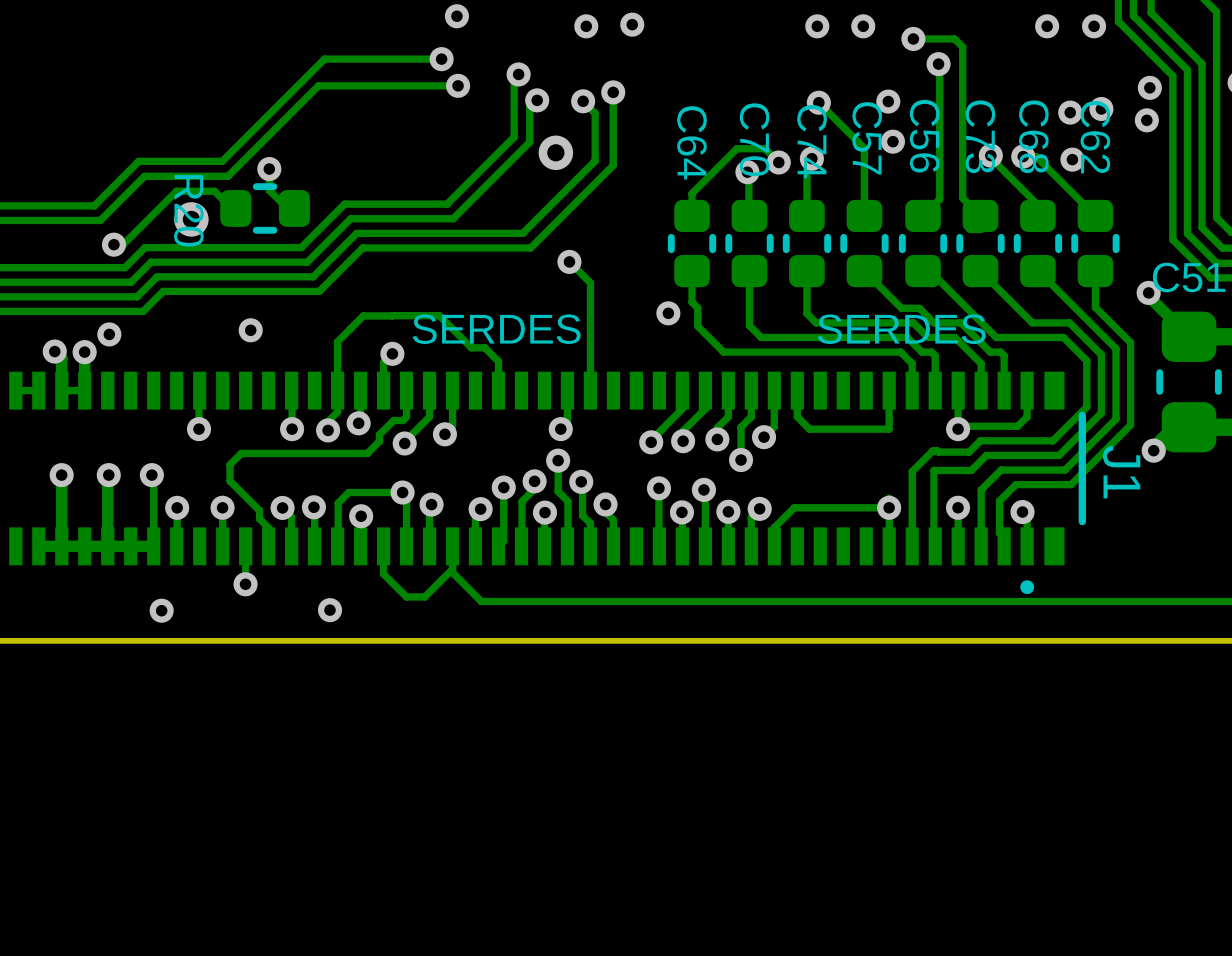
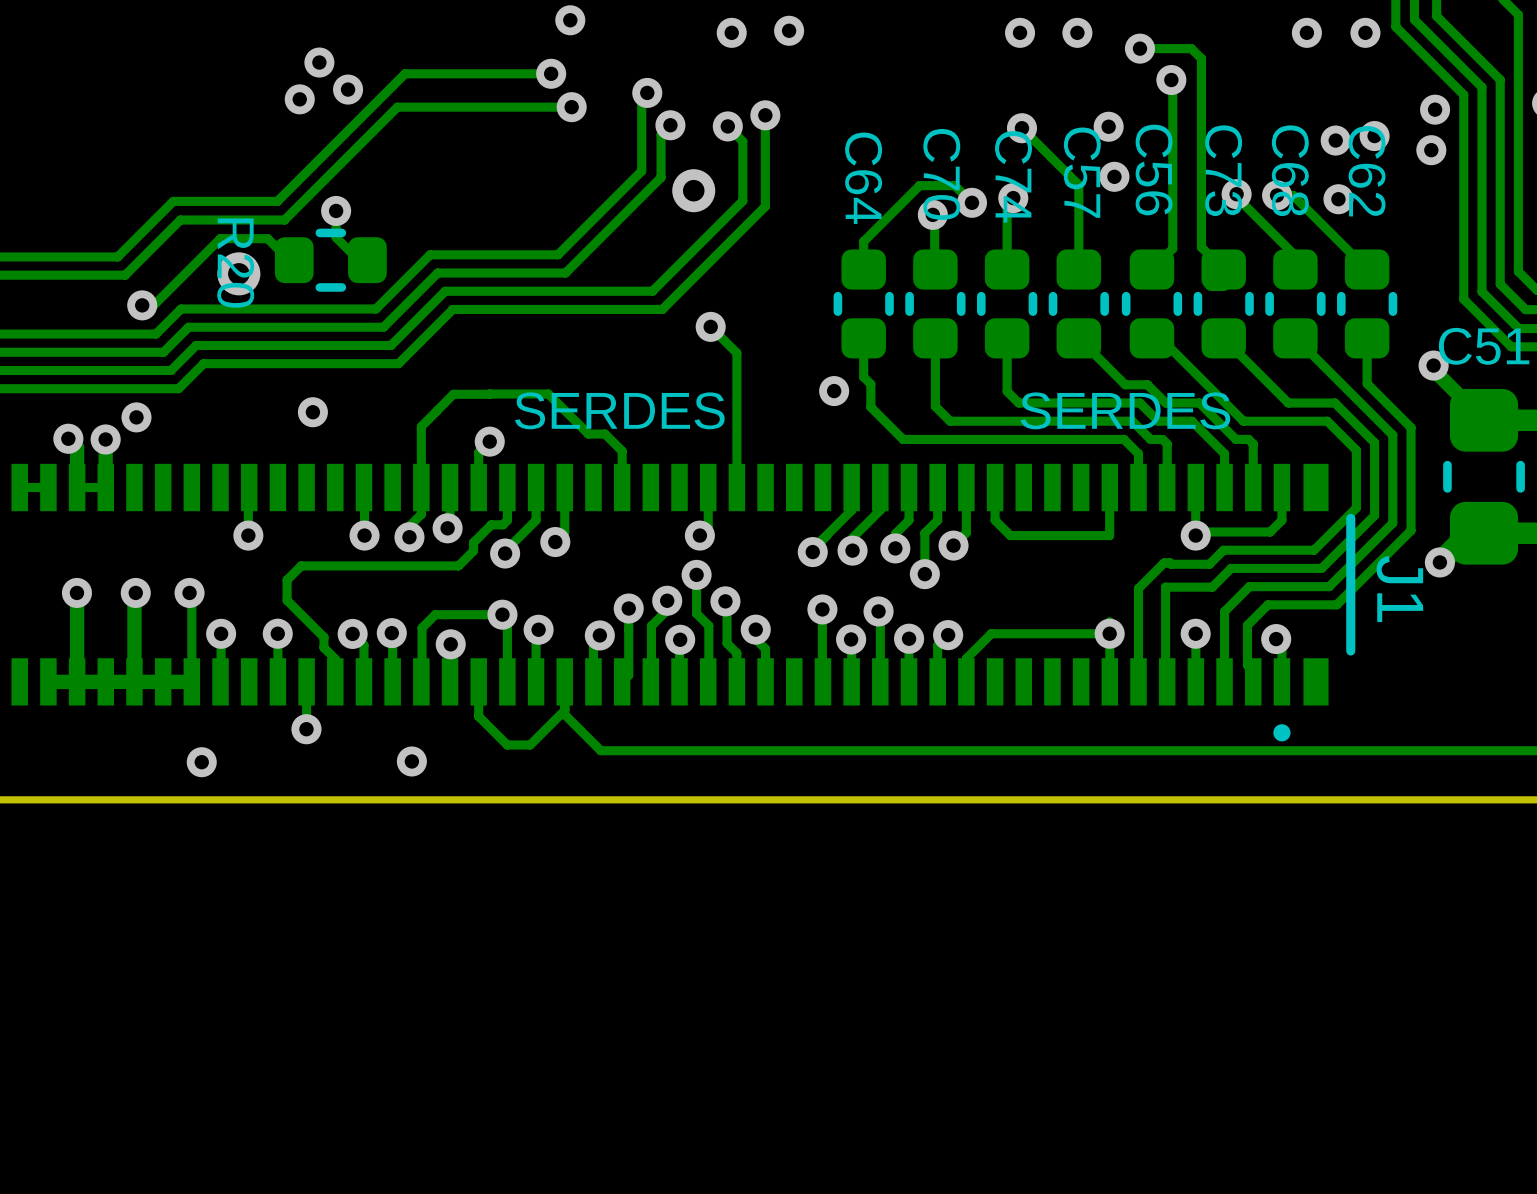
via: none -> (319, 62)
via: none -> (348, 89)
via: none -> (299, 99)

